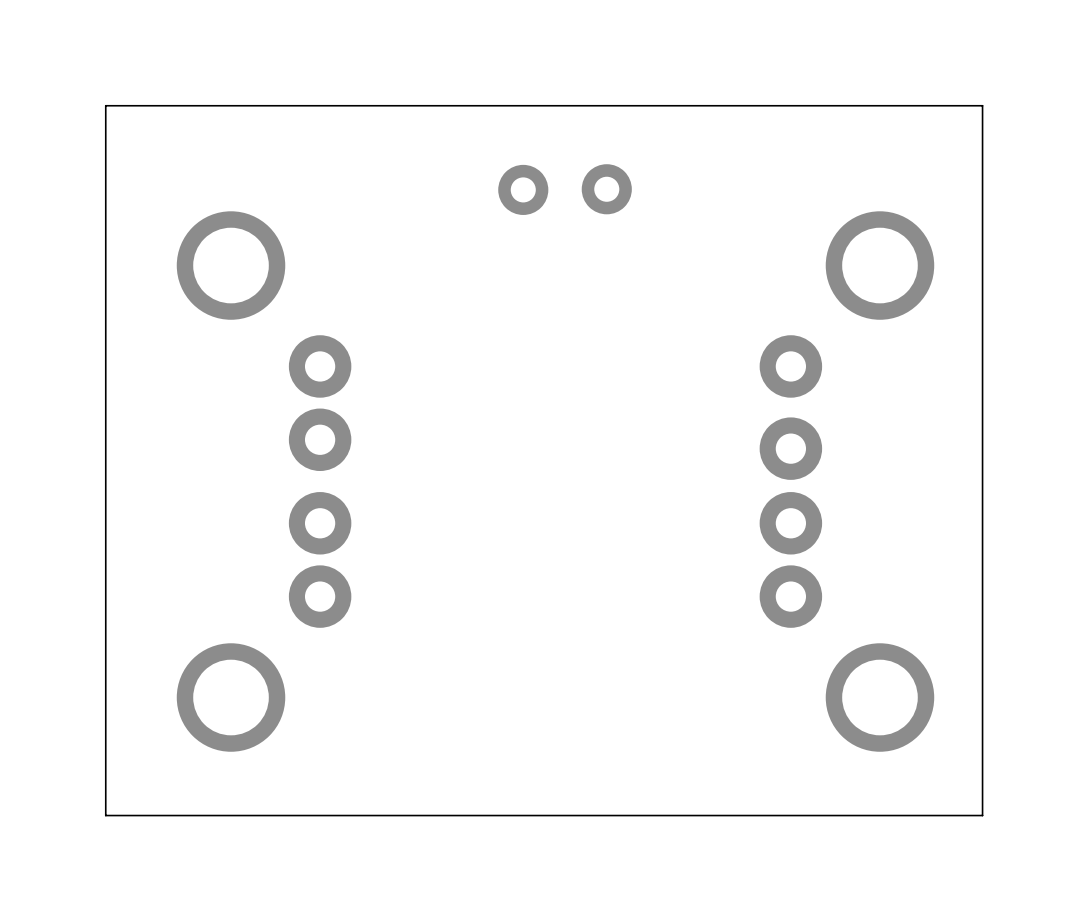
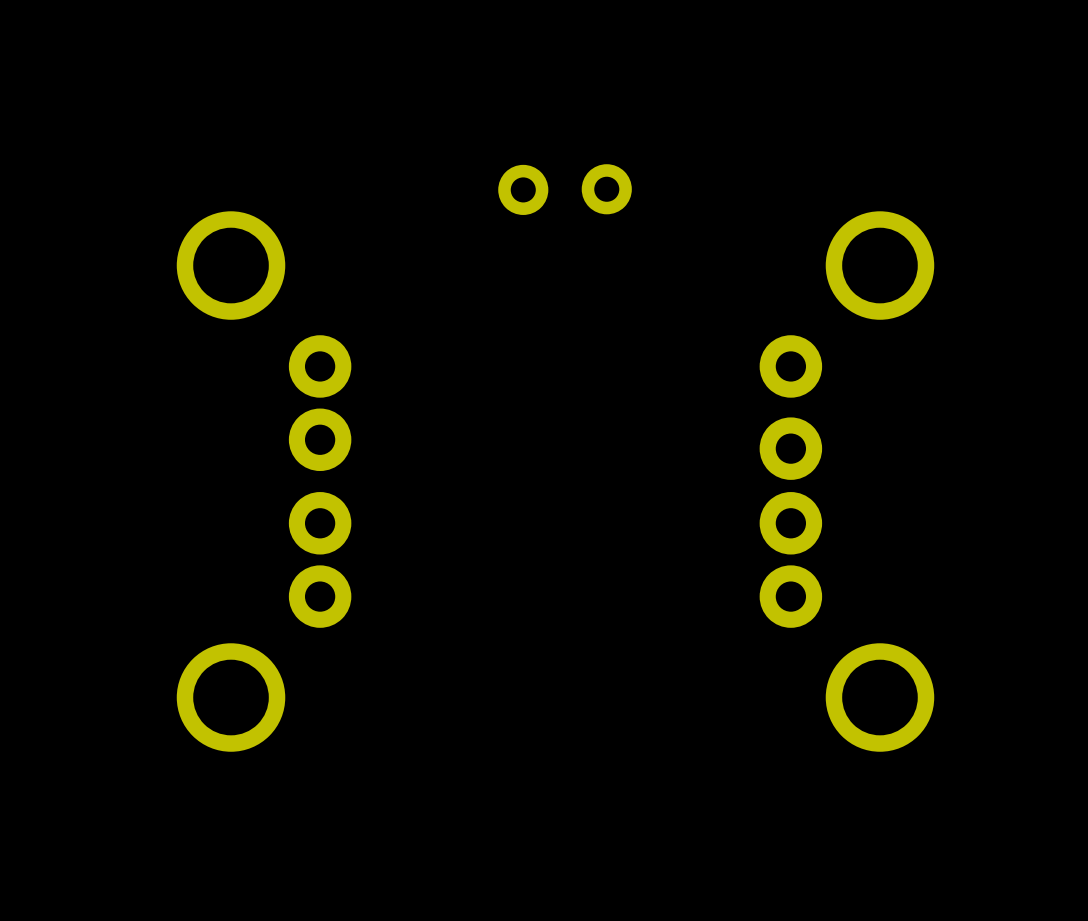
board edge: (982, 105) (982, 815) (105, 815) (105, 105) (982, 105) -> none

